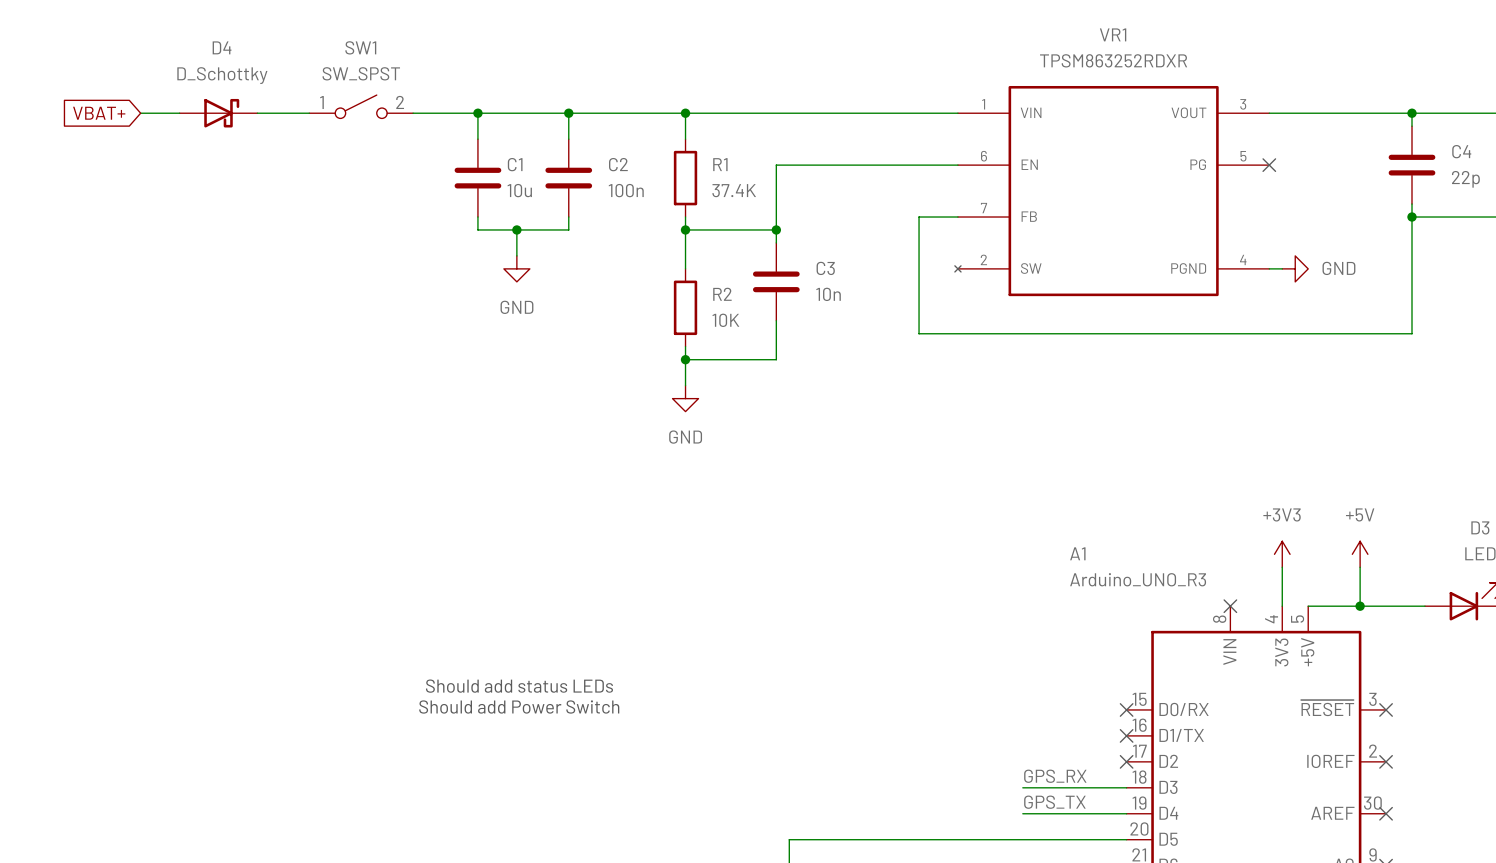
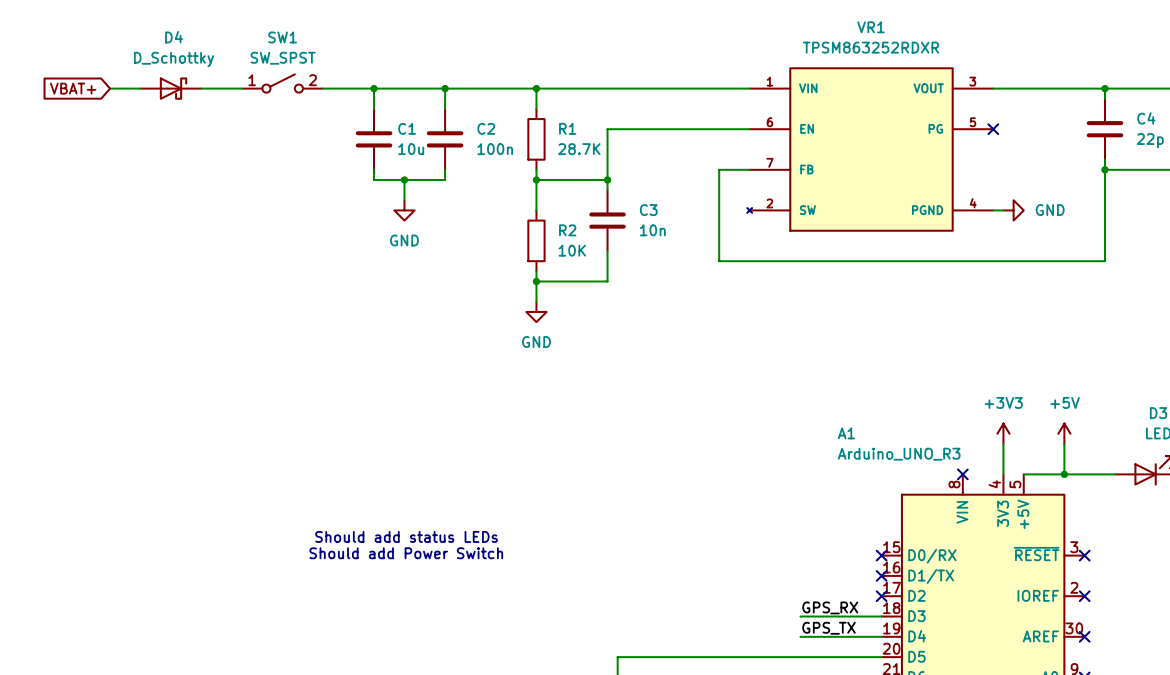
R1 value: 37.4K (734, 190) -> 28.7K (579, 149)

